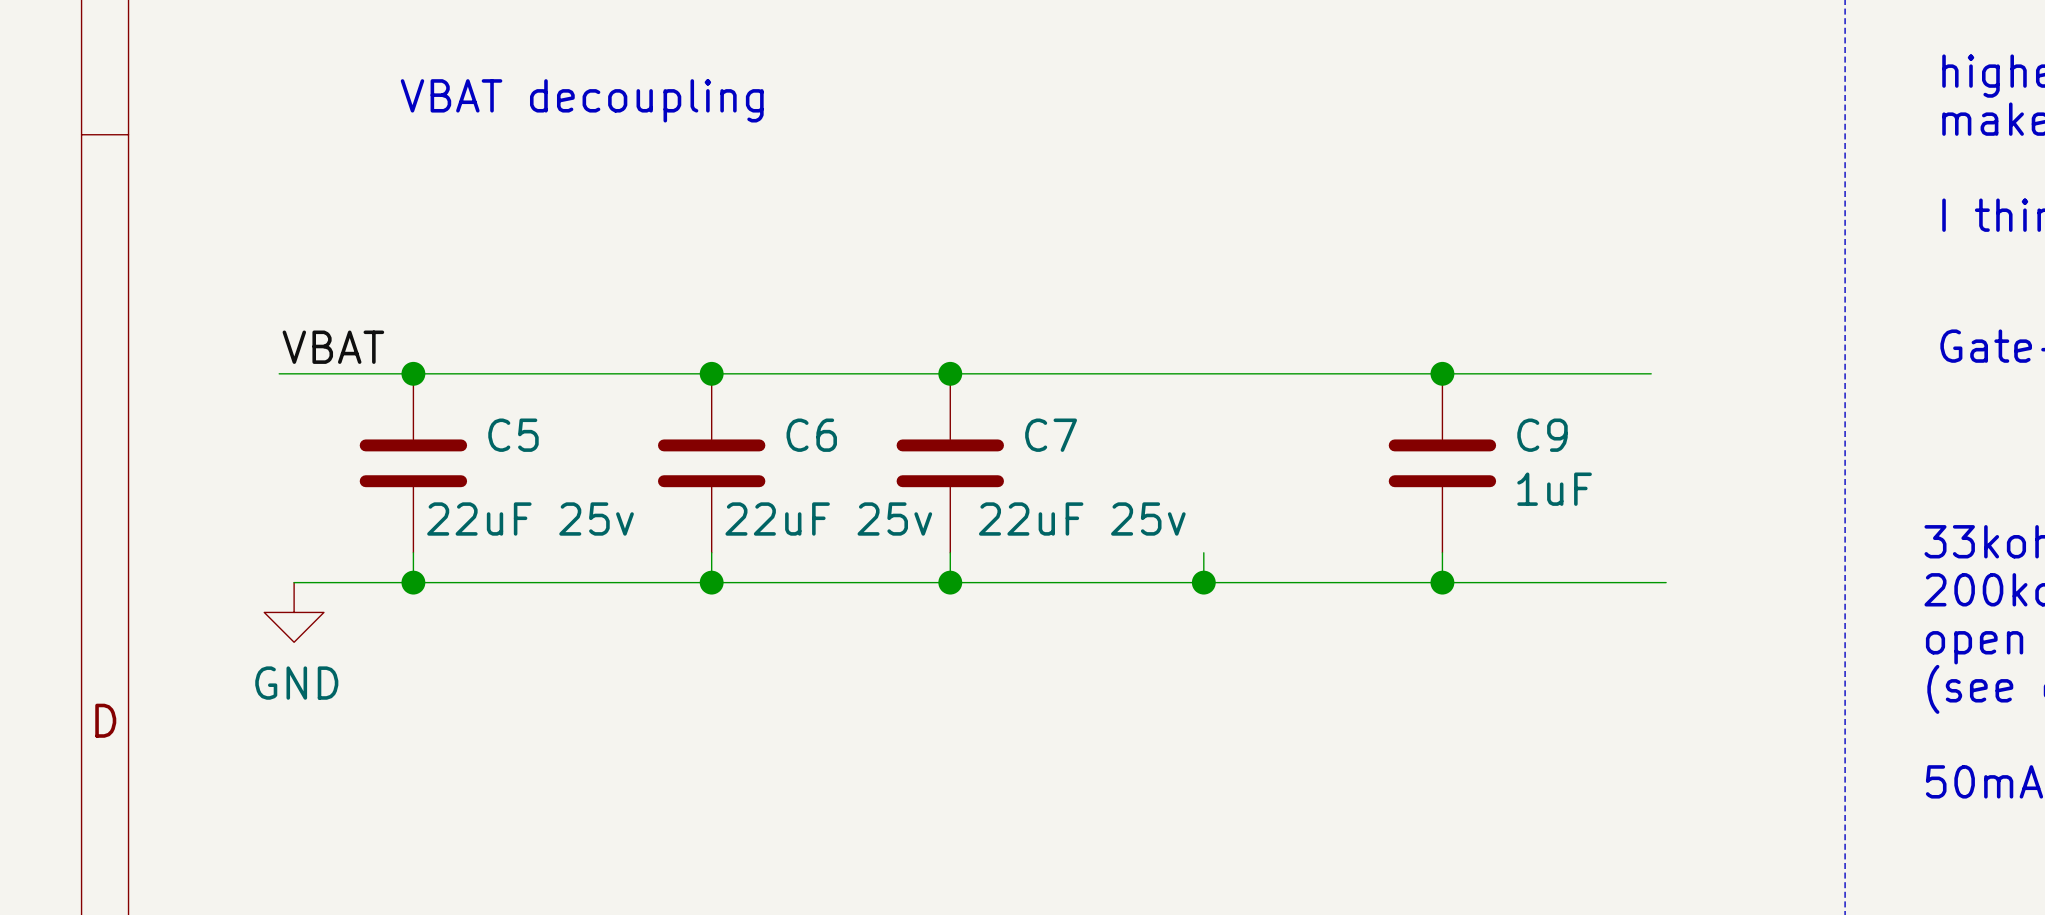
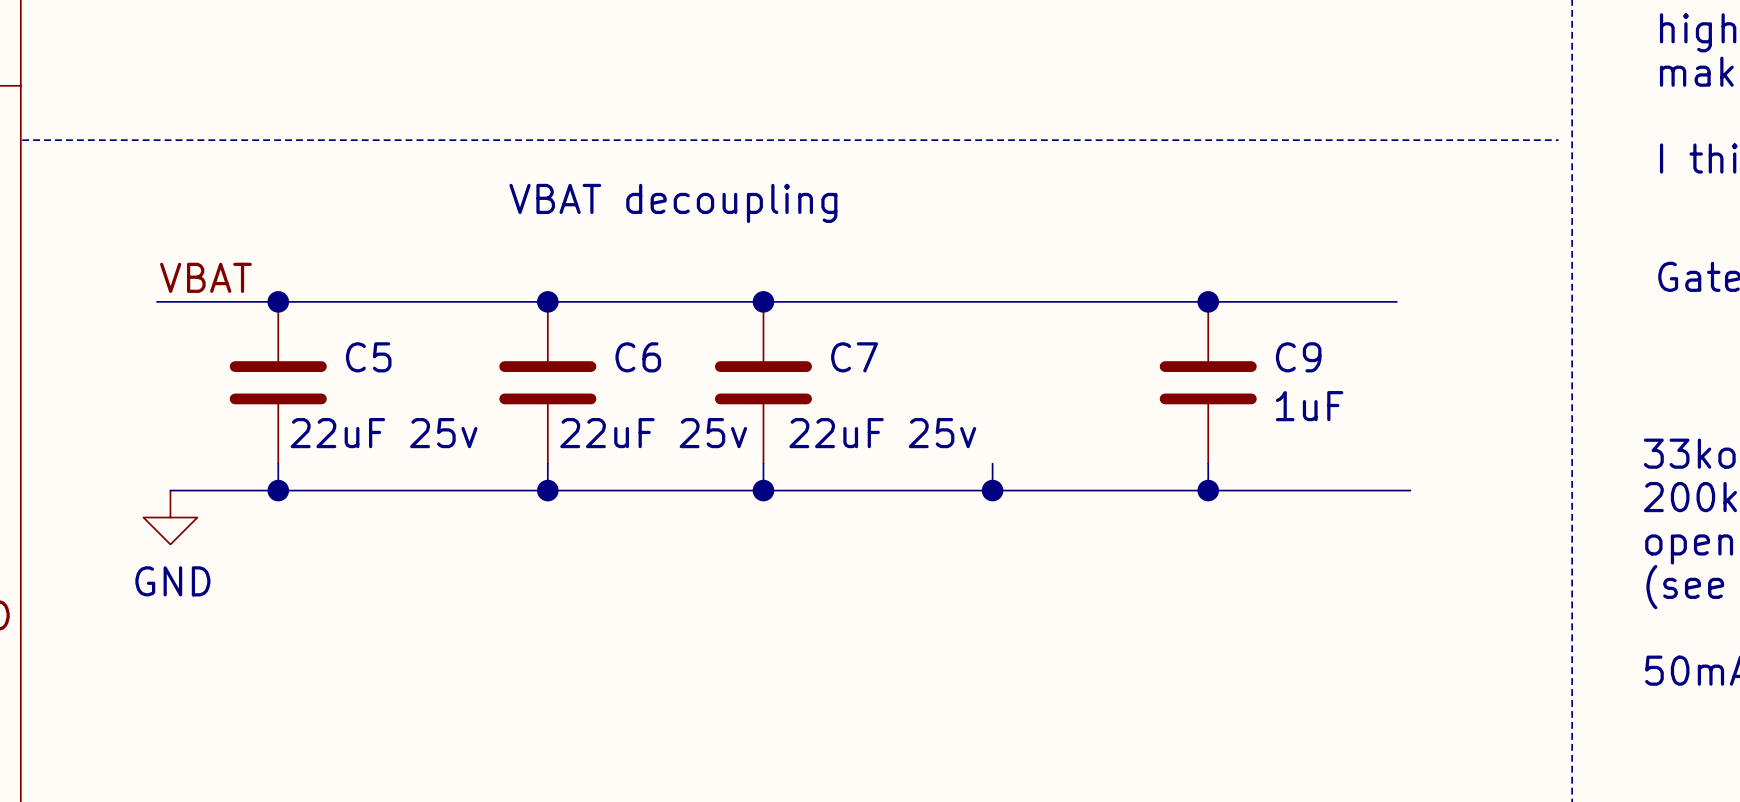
text position: VBAT decoupling (582, 100) -> VBAT decoupling (673, 203)
line: none -> (22, 140) (1558, 140)

